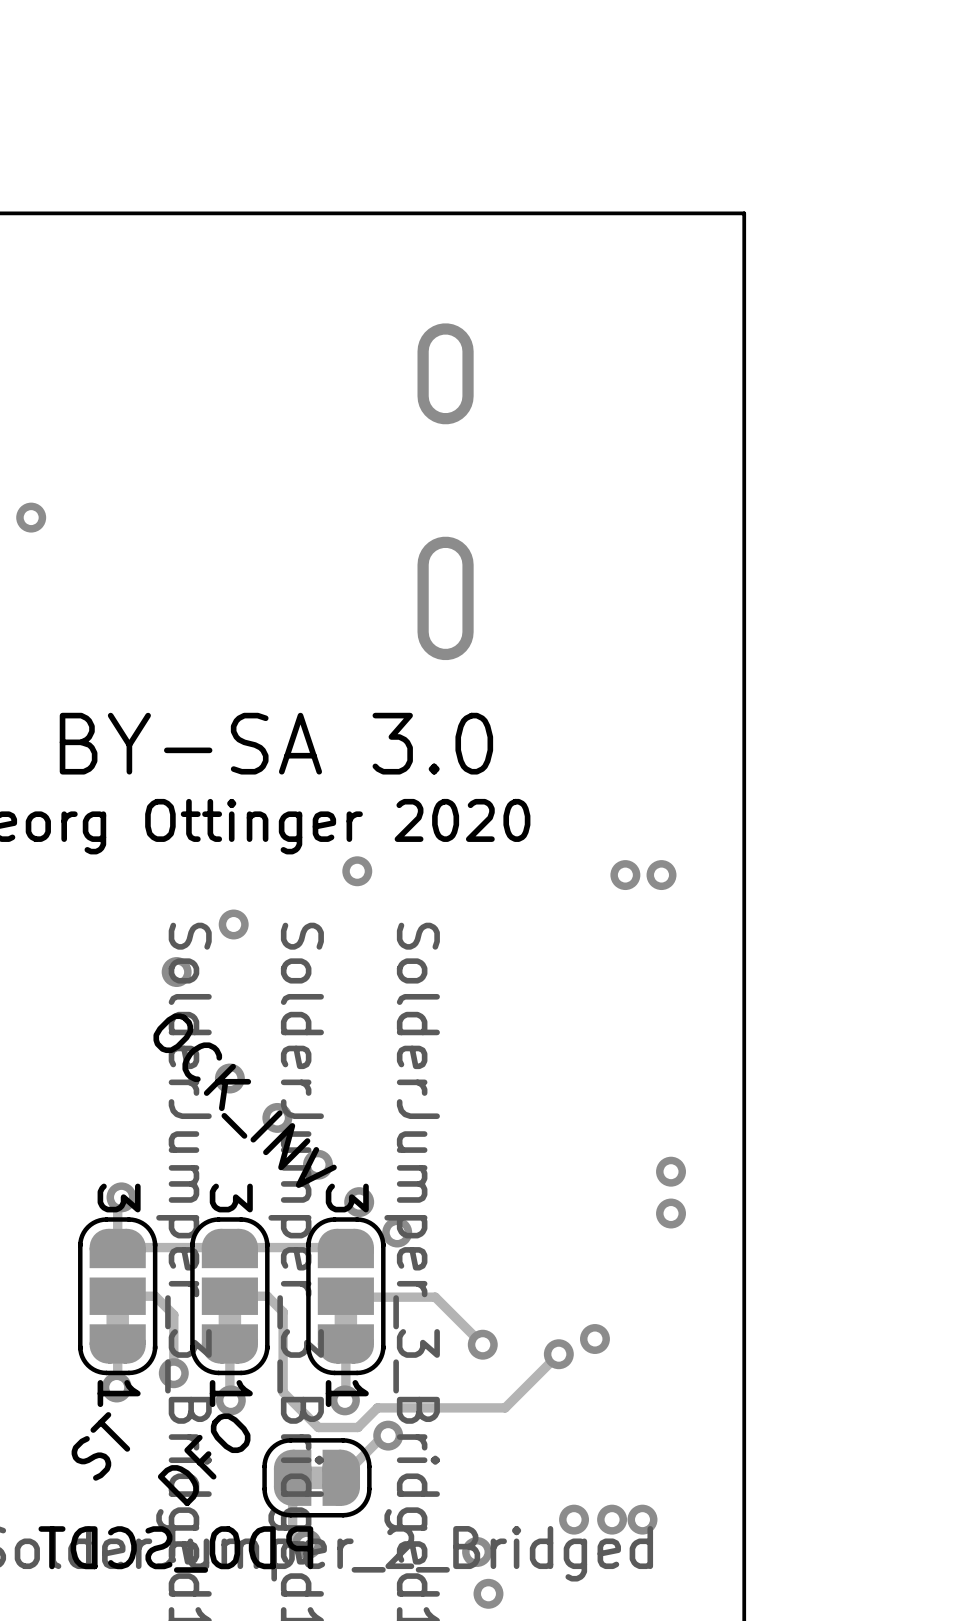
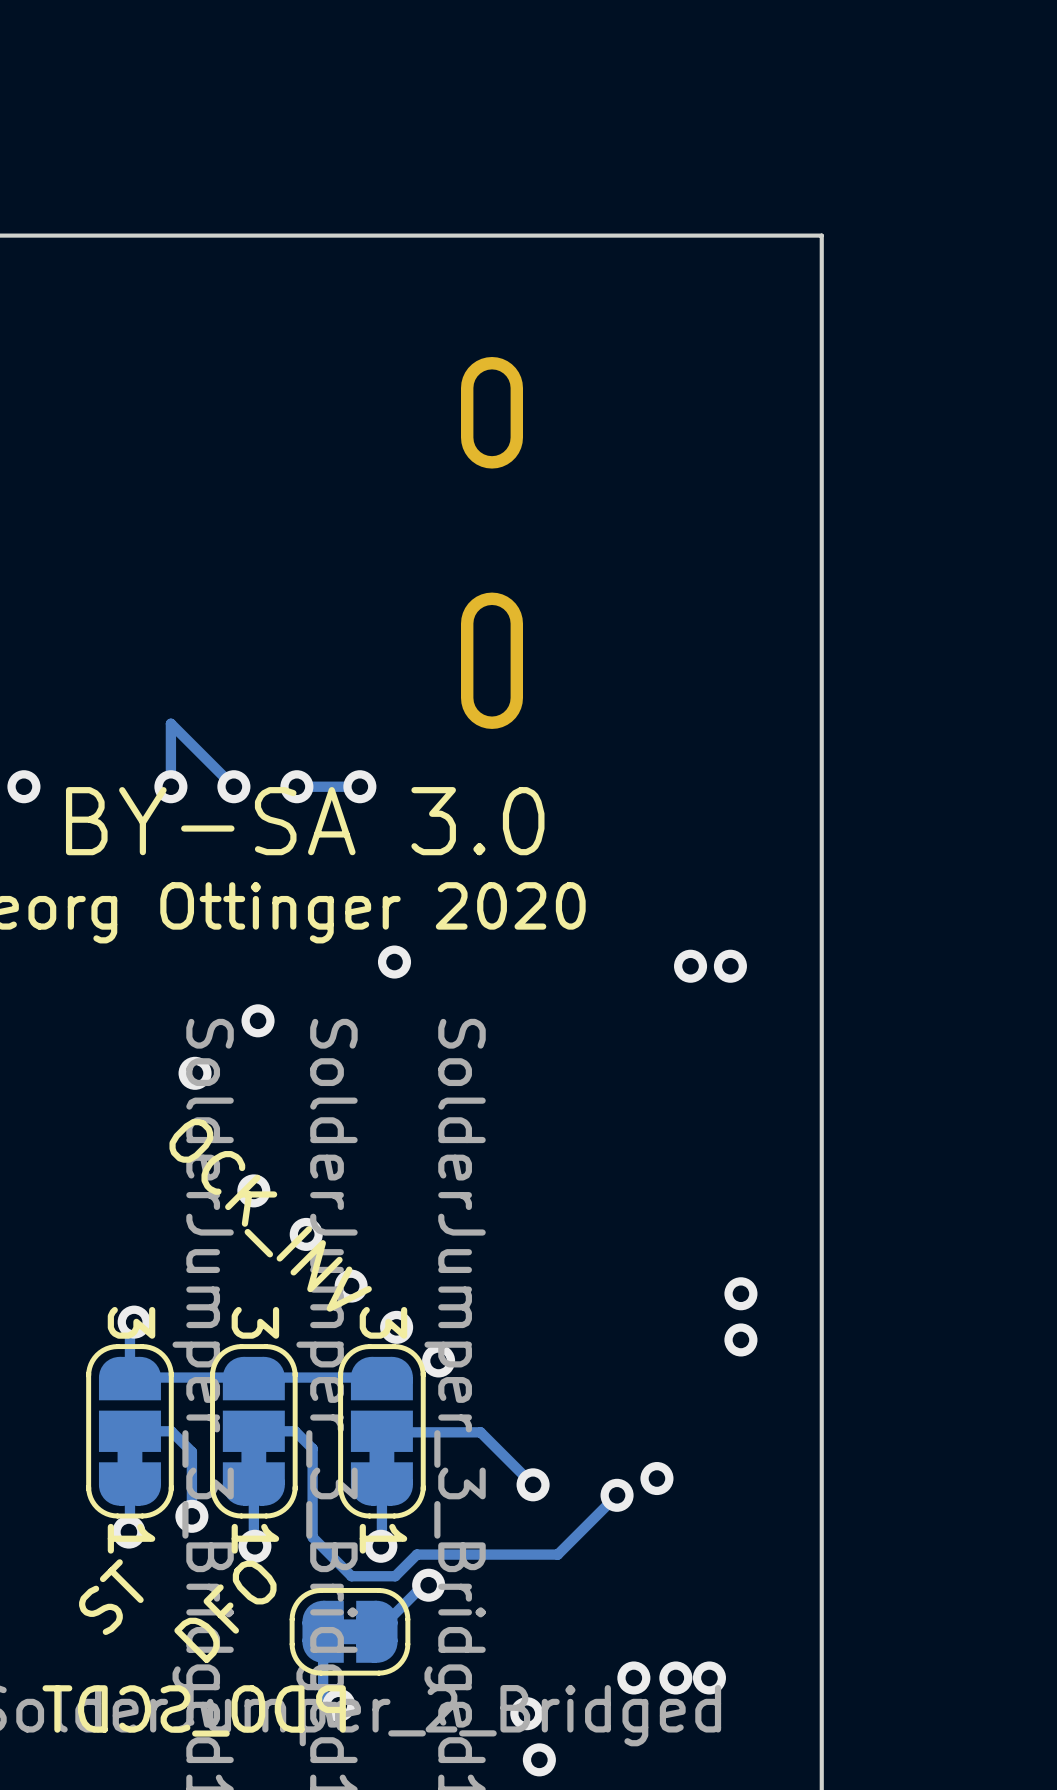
via: (31, 517) -> none
via: none -> (23, 786)
via: none -> (170, 786)
track: none -> (233, 786) (170, 723) (170, 786)
via: none -> (233, 786)
via: none -> (296, 786)
track: none -> (359, 786) (296, 786)
via: none -> (359, 786)

